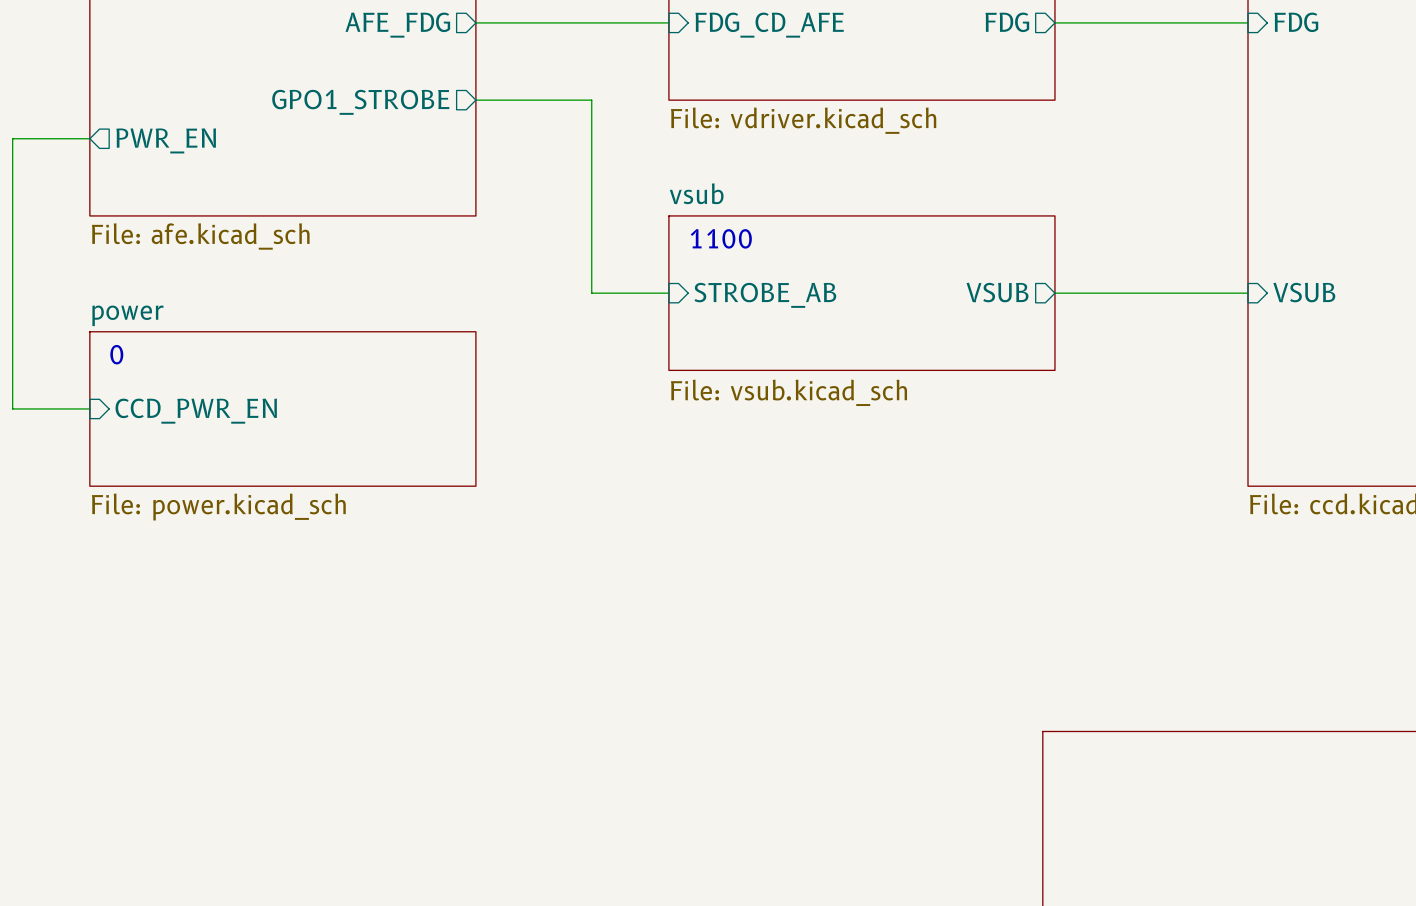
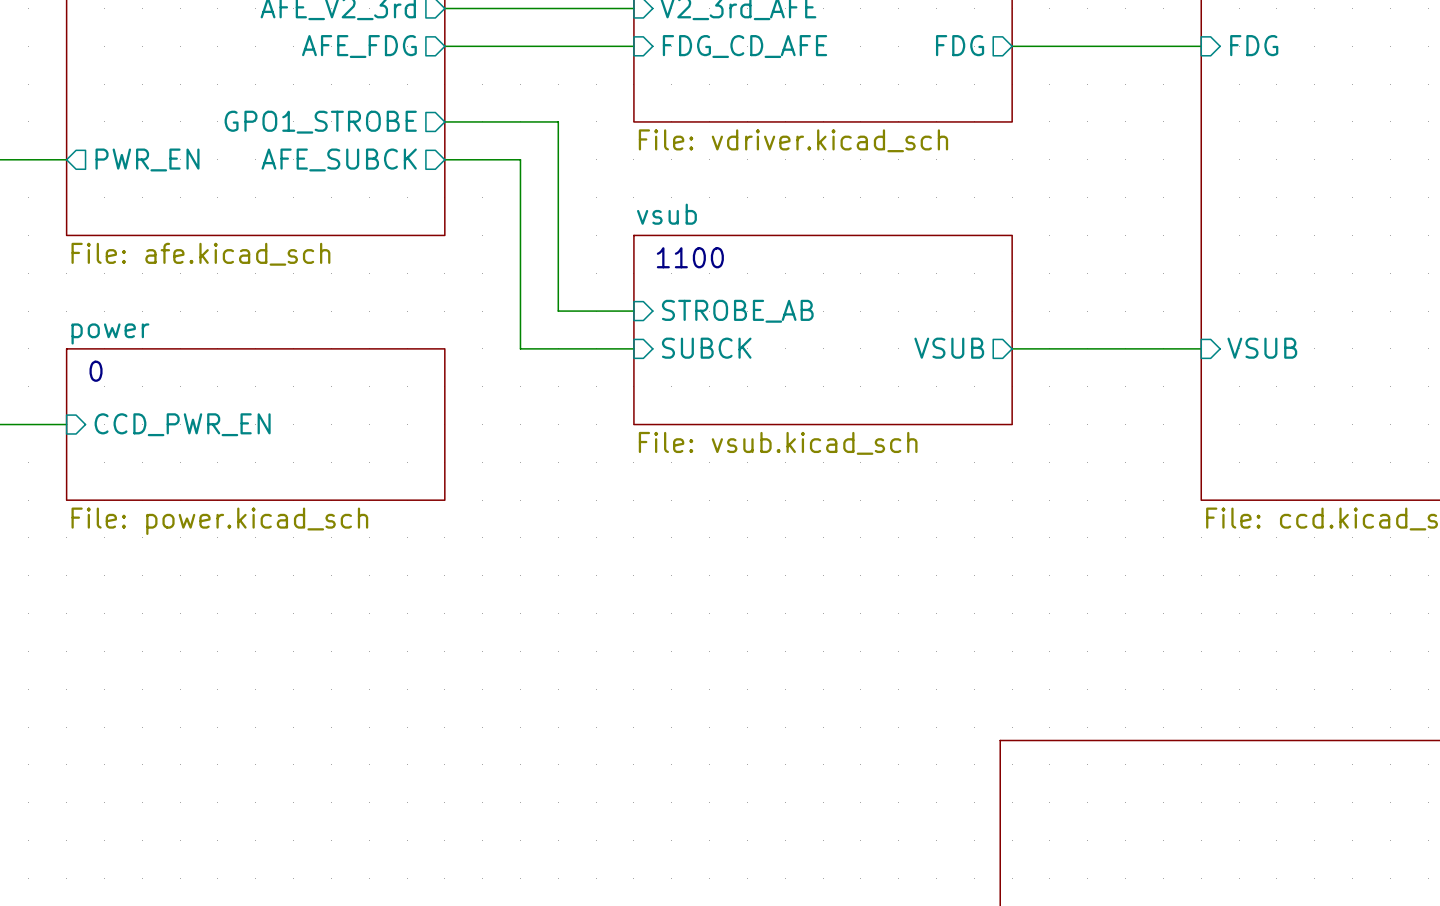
wire: none -> (444, 159) (520, 159) (520, 348) (633, 348)
sheet pin: none -> AFE_SUBCK (339, 159)
sheet pin position: VSUB (997, 292) -> VSUB (949, 348)
sheet pin position: VSUB (1304, 292) -> VSUB (1262, 348)
sheet vsub: File: vsub.kicad_sch (861, 293) -> none
wire: (1054, 293) (1248, 293) -> (1012, 348) (1201, 348)
sheet vsub: none -> File: vsub.kicad_sch (823, 329)
sheet pin: none -> SUBCK (706, 348)

